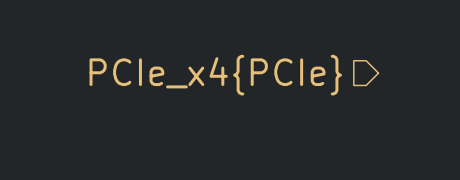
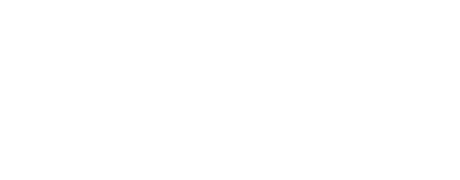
hierarchical label: PCIe_x4{PCIe} (215, 75) -> none

